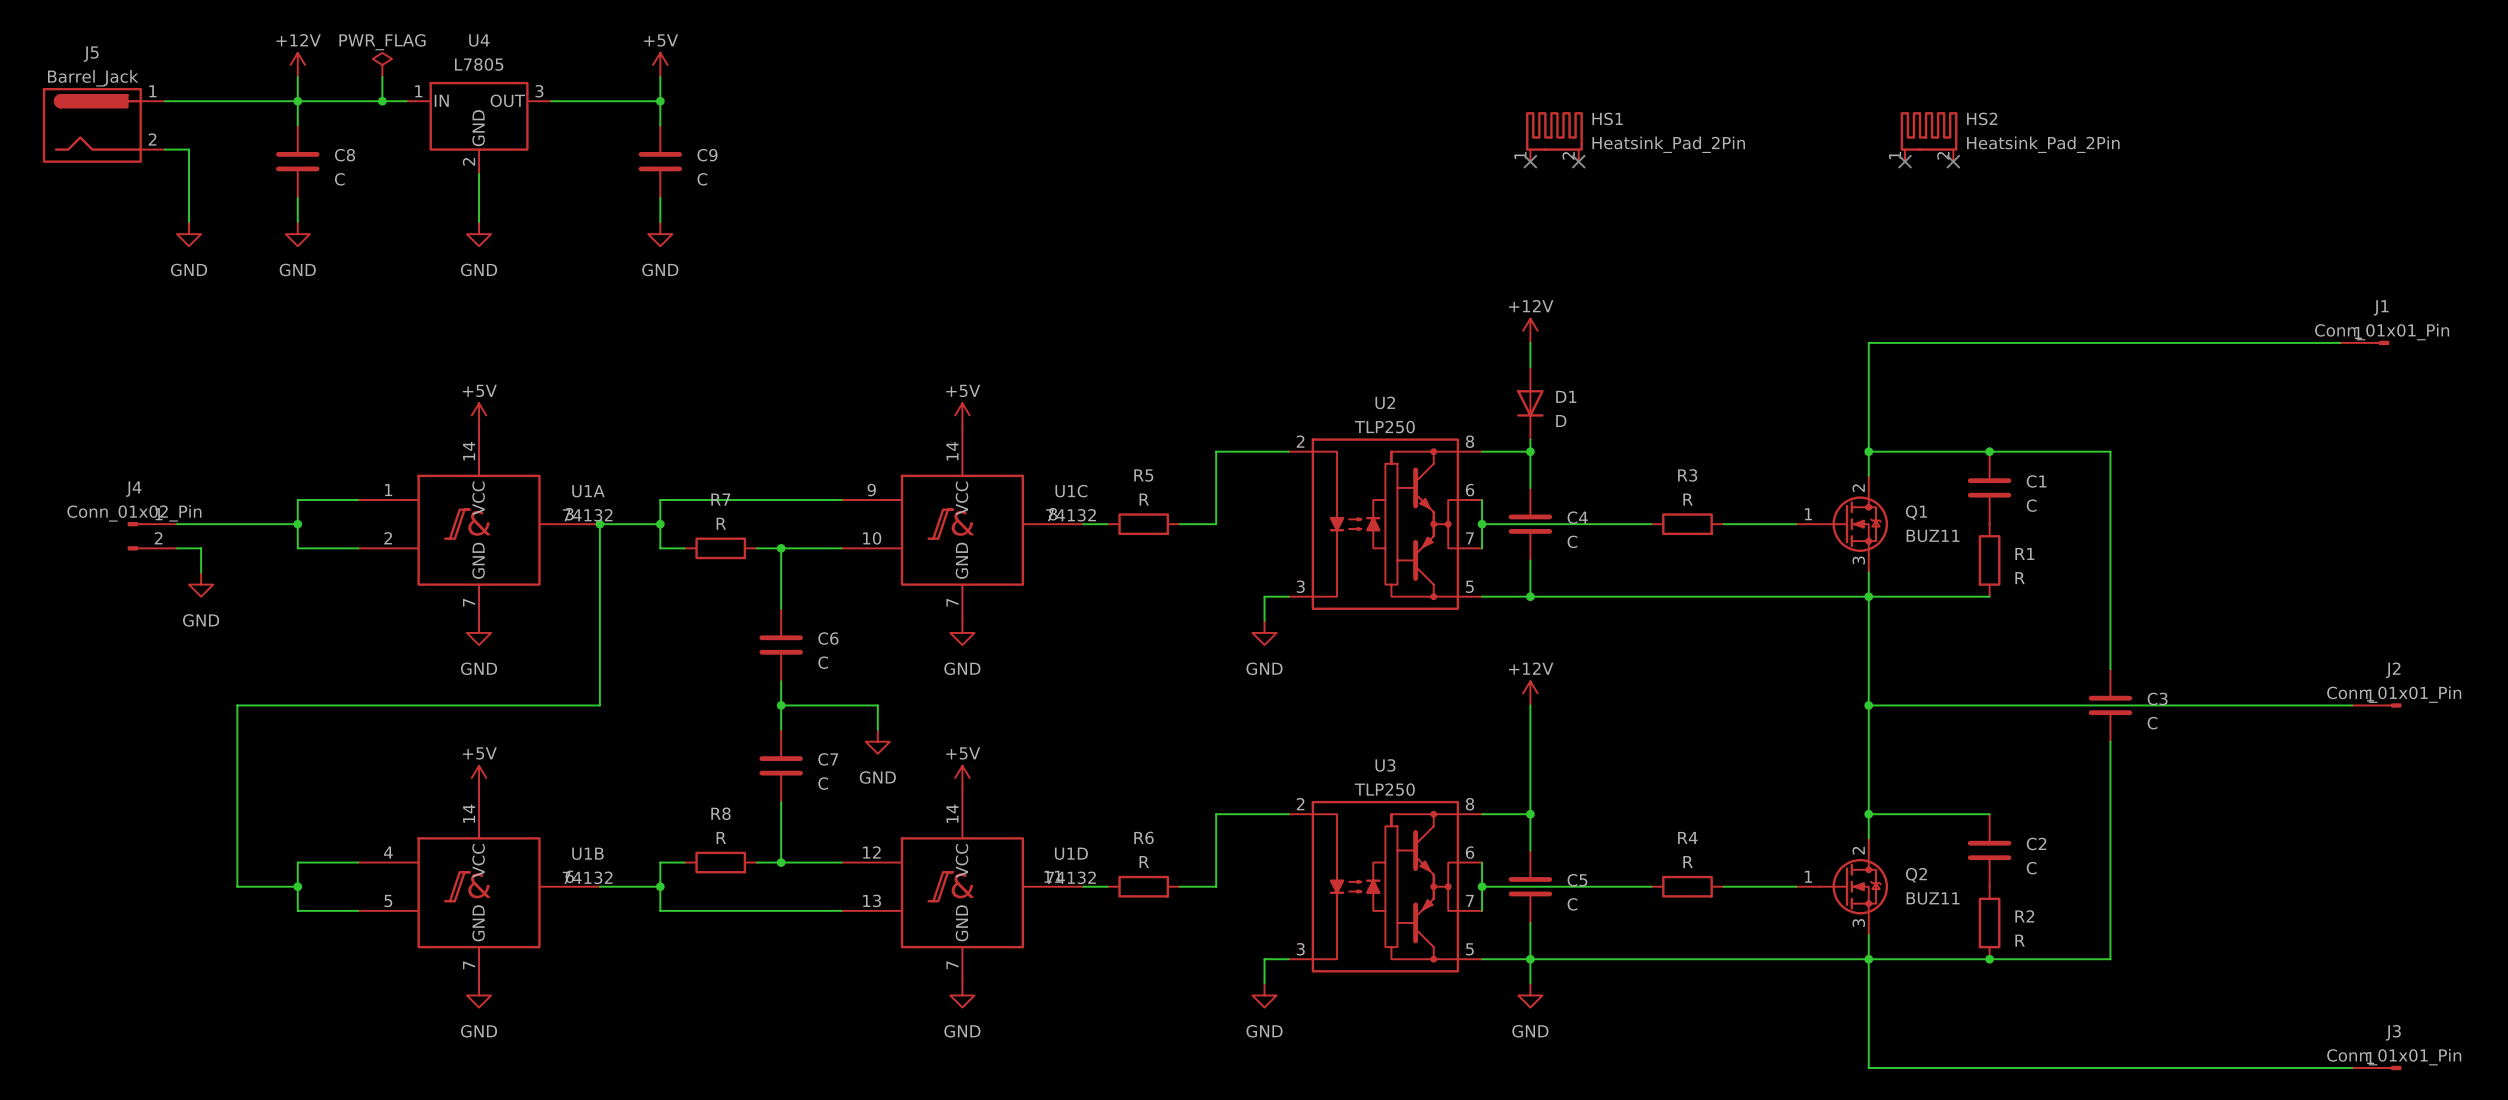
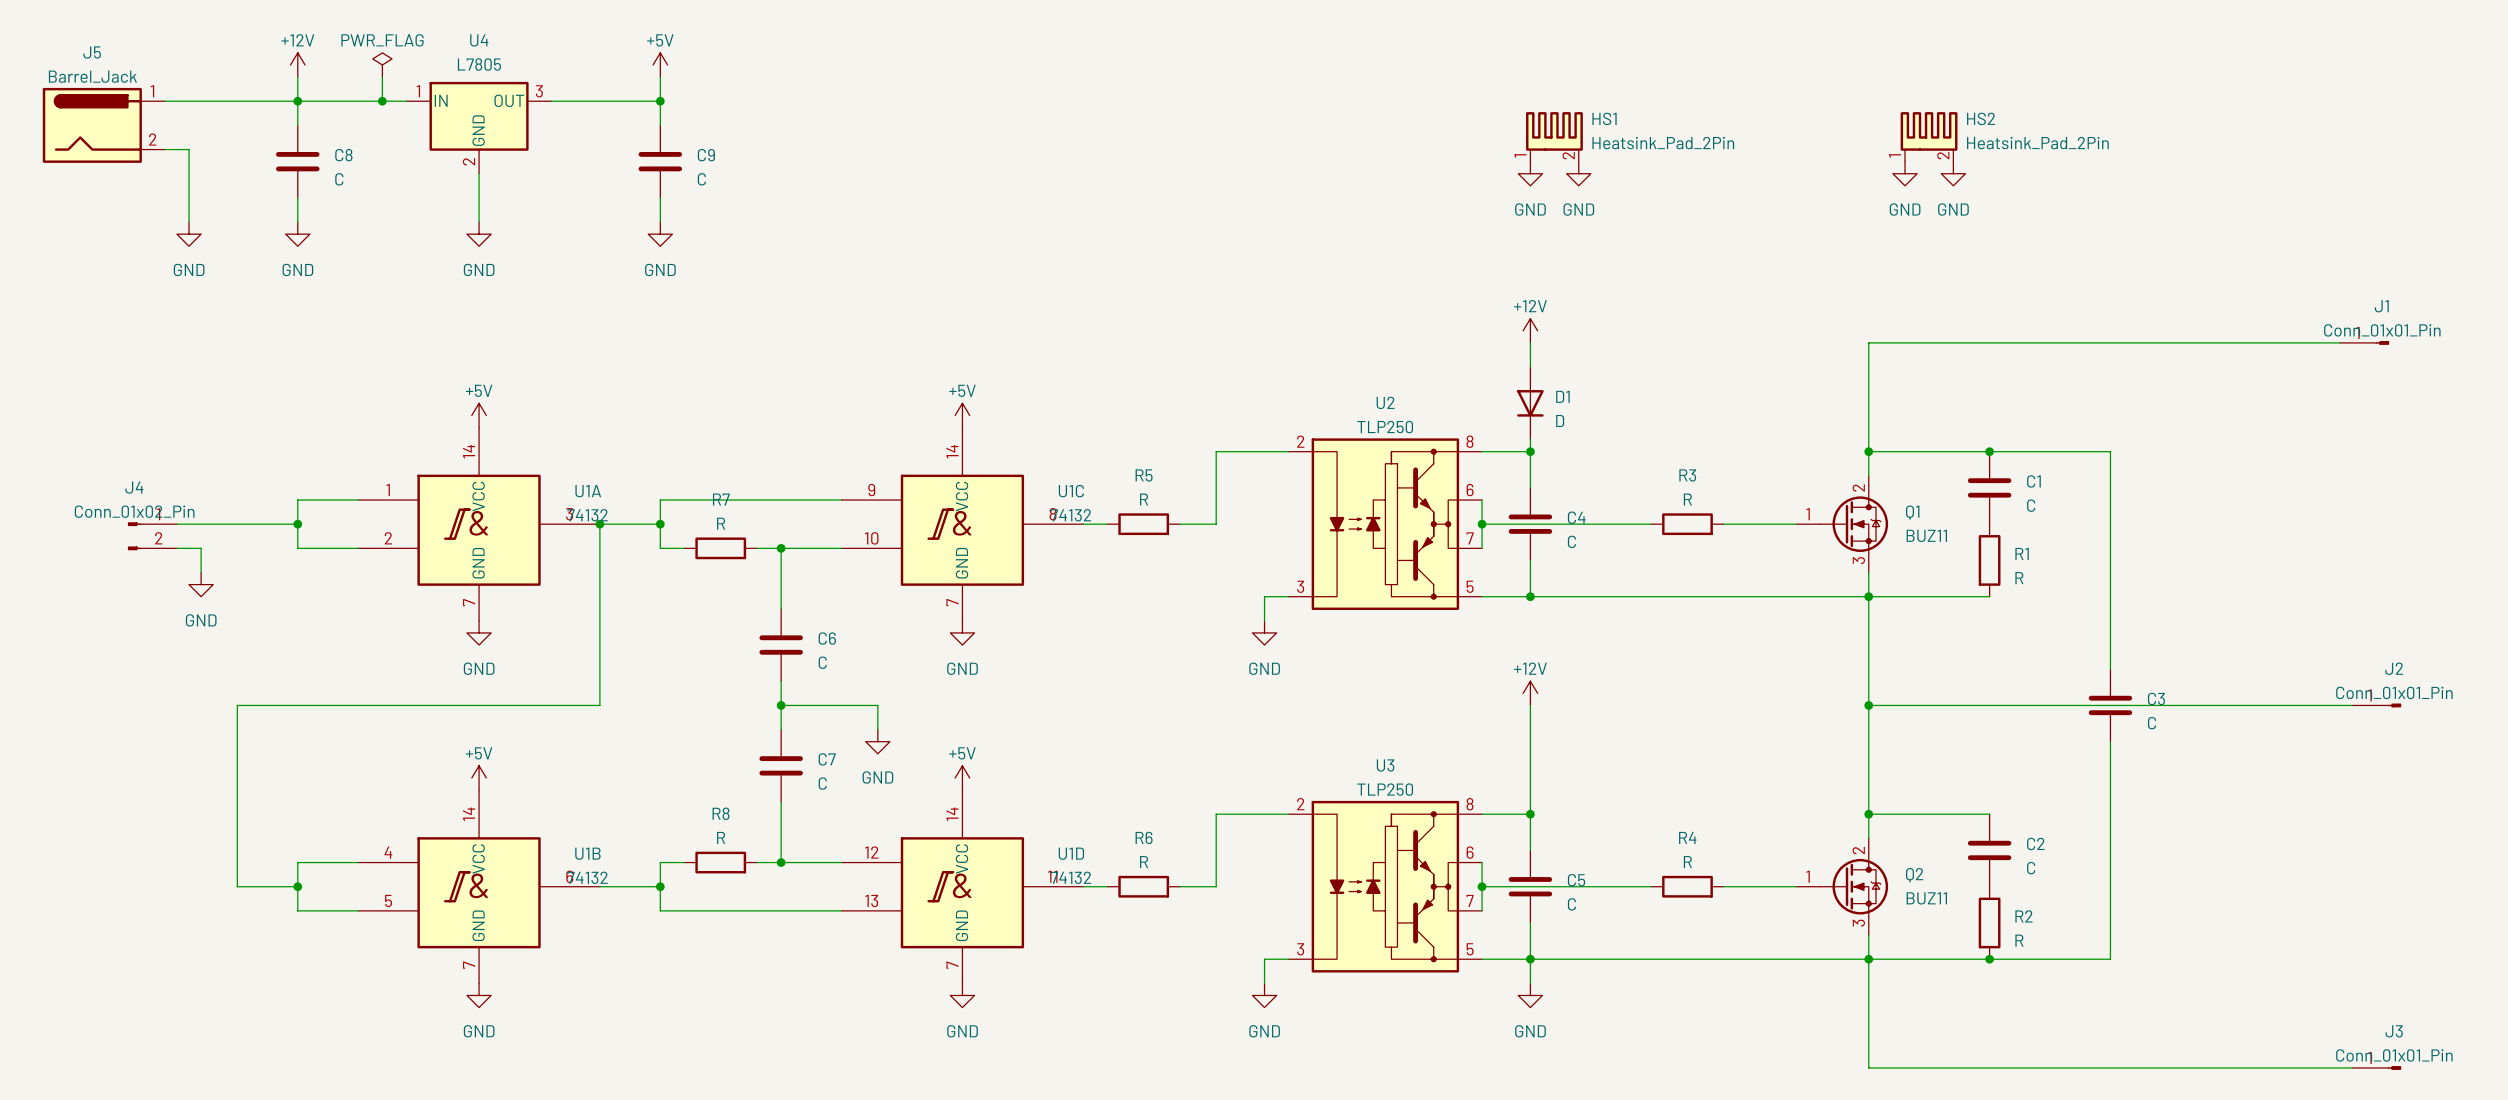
no-connect mark: (1530, 161) -> none
no-connect mark: (1578, 161) -> none
no-connect mark: (1905, 161) -> none
no-connect mark: (1953, 161) -> none
power symbol: none -> GND (1530, 173)
power symbol: none -> GND (1578, 173)
power symbol: none -> GND (1905, 173)
power symbol: none -> GND (1953, 173)

